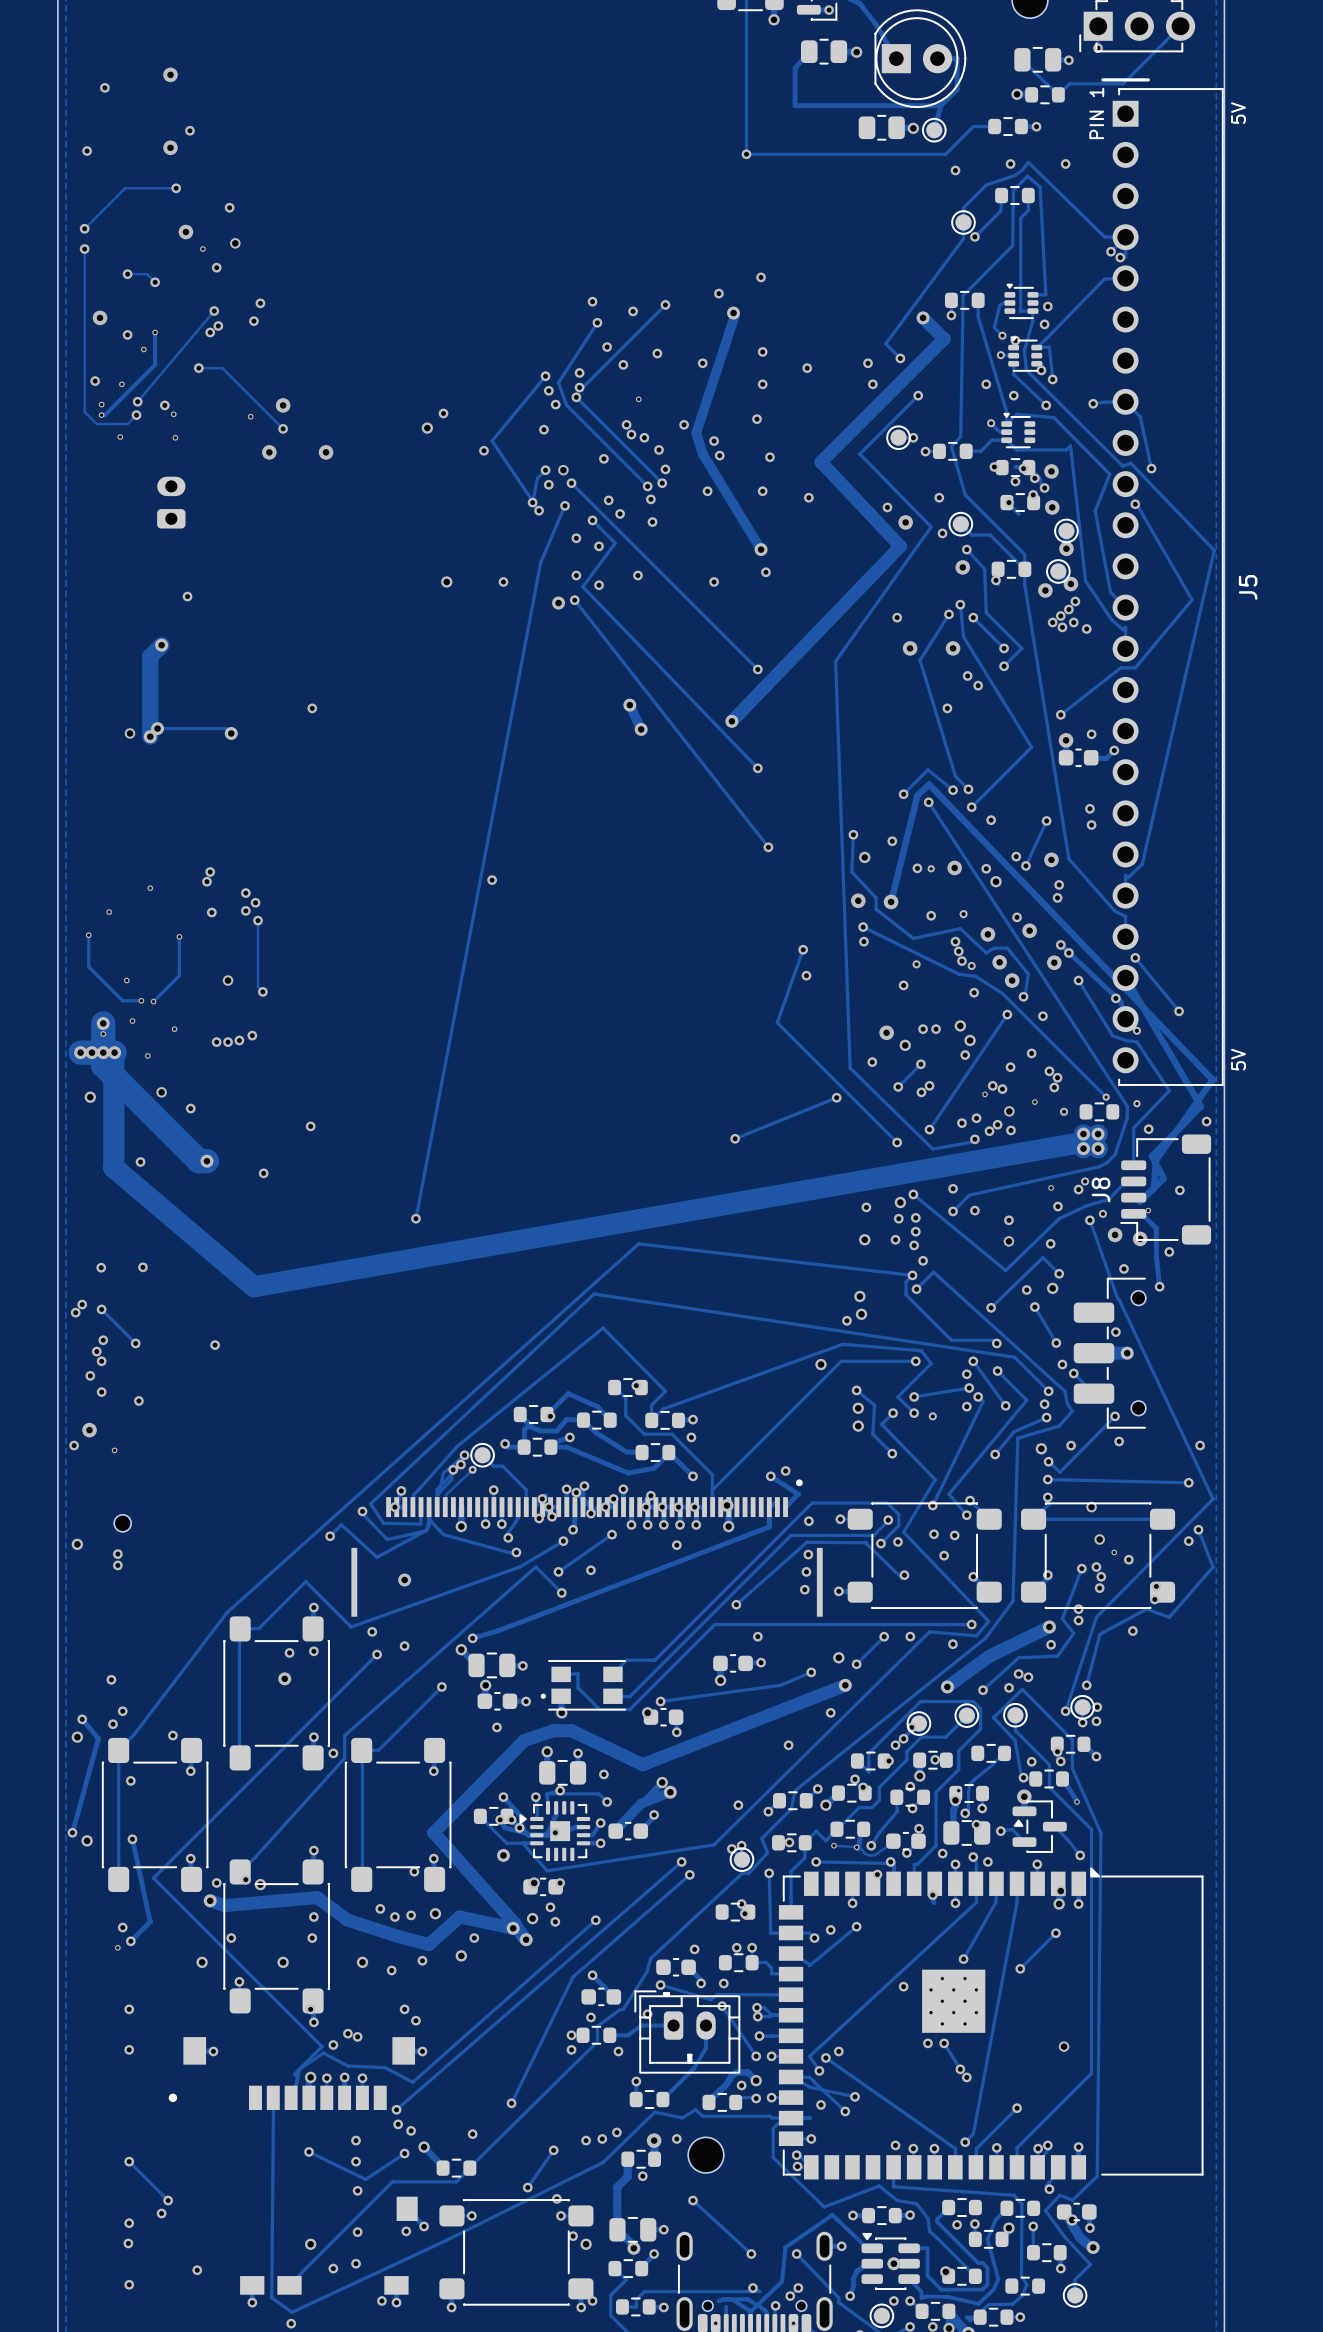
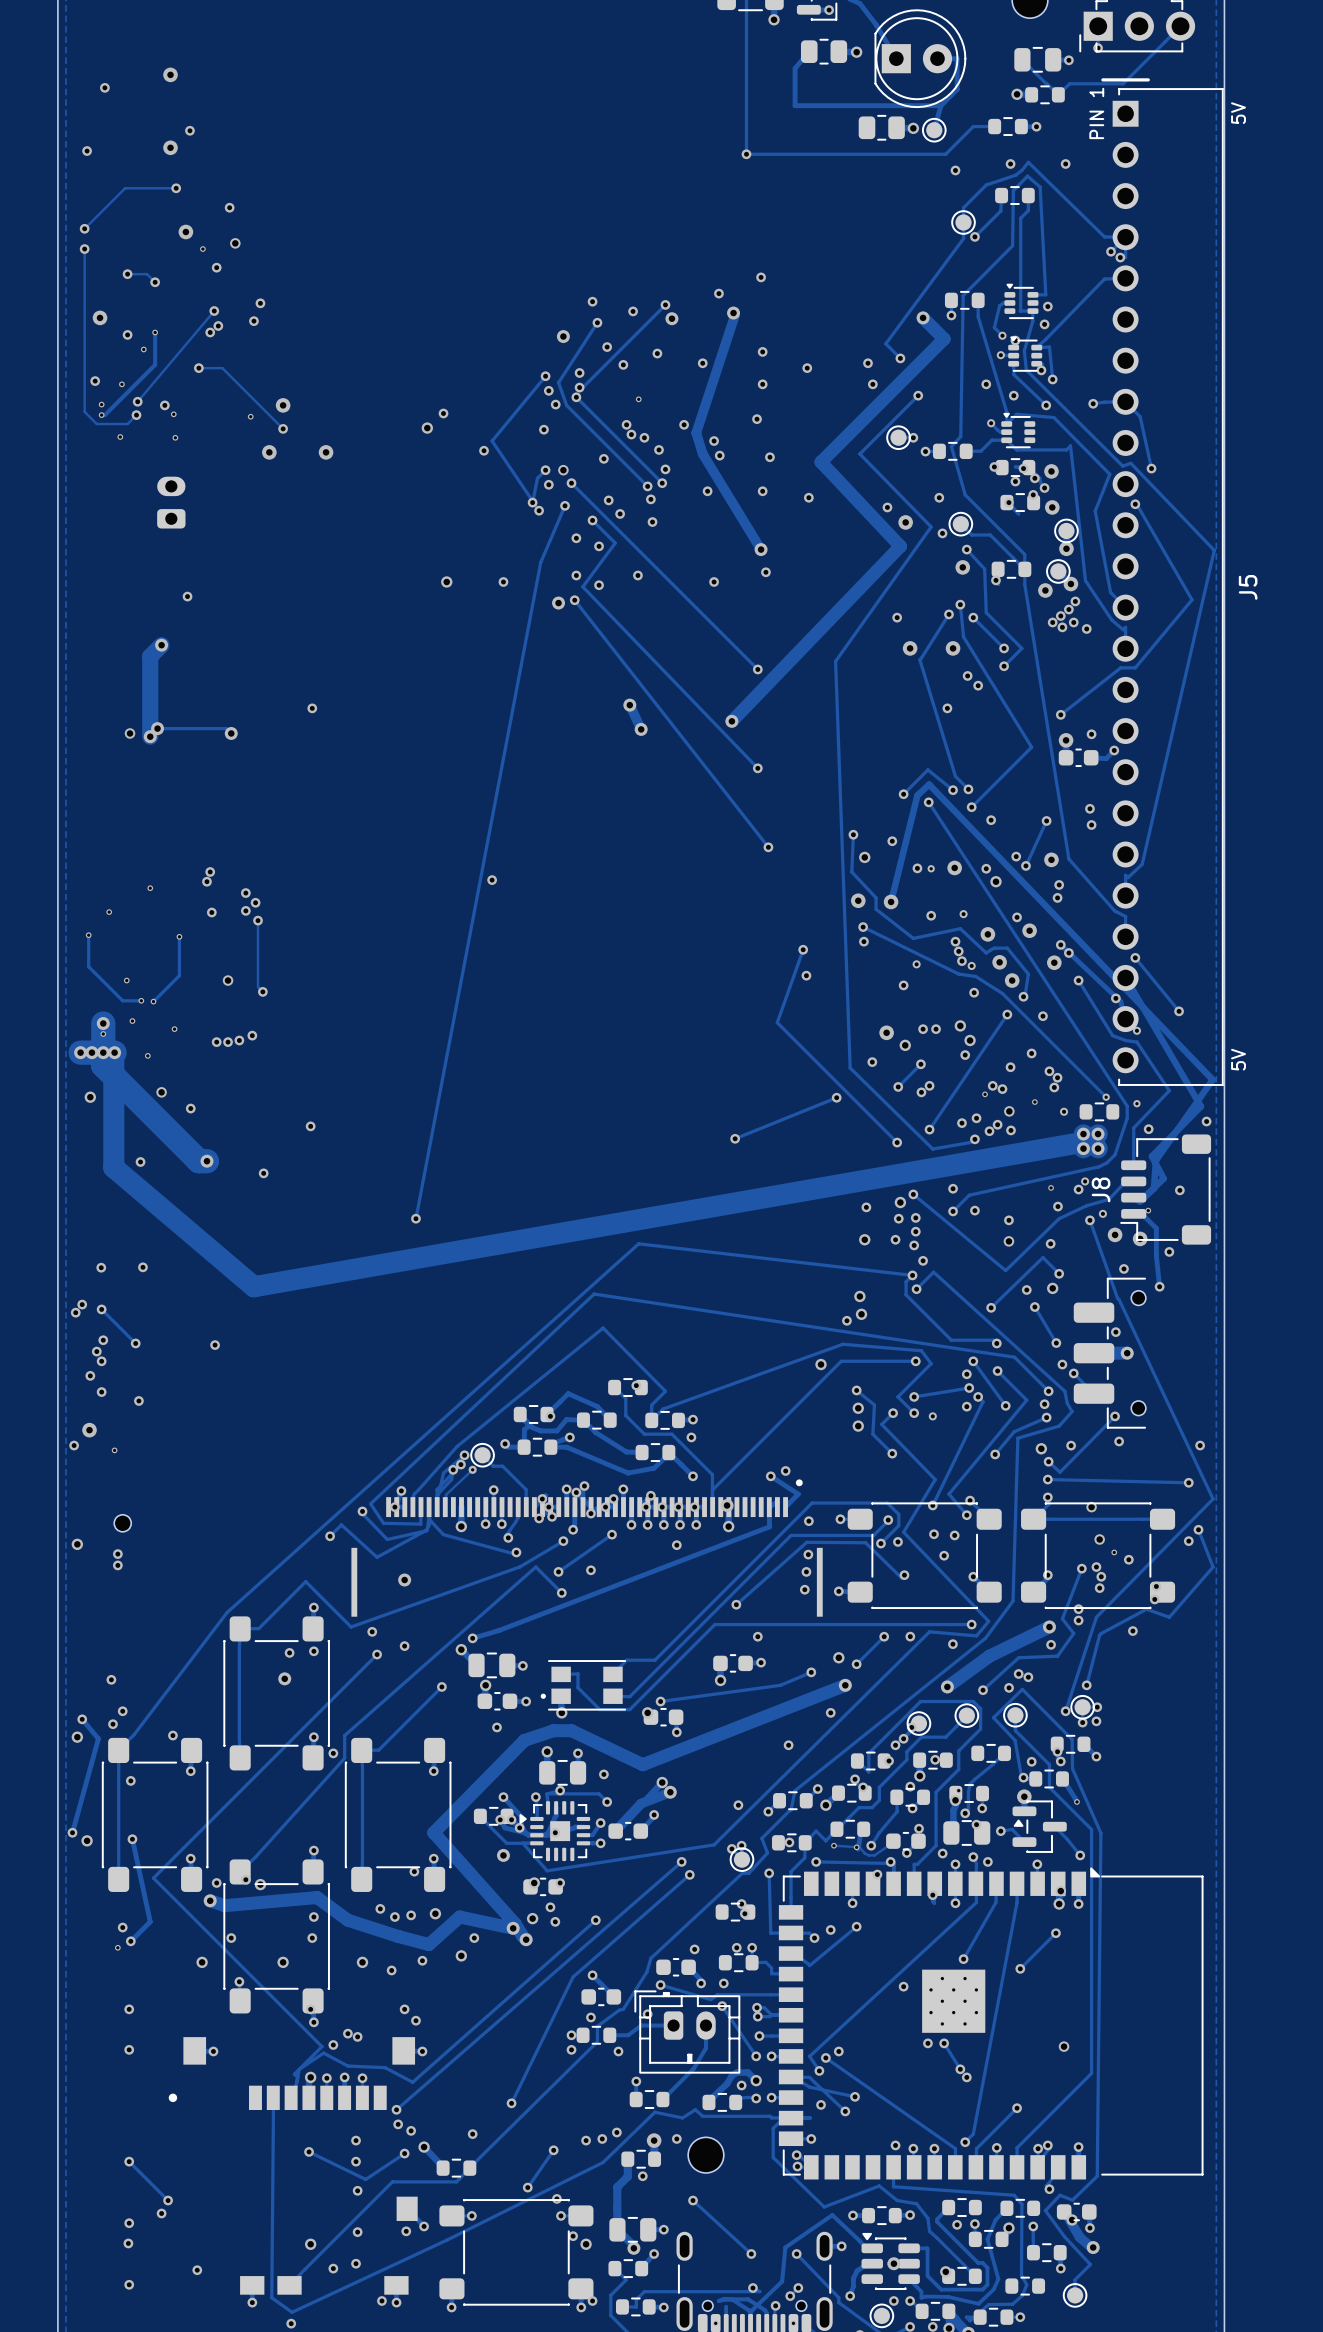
via: none -> (671, 318)
via: none -> (563, 336)

